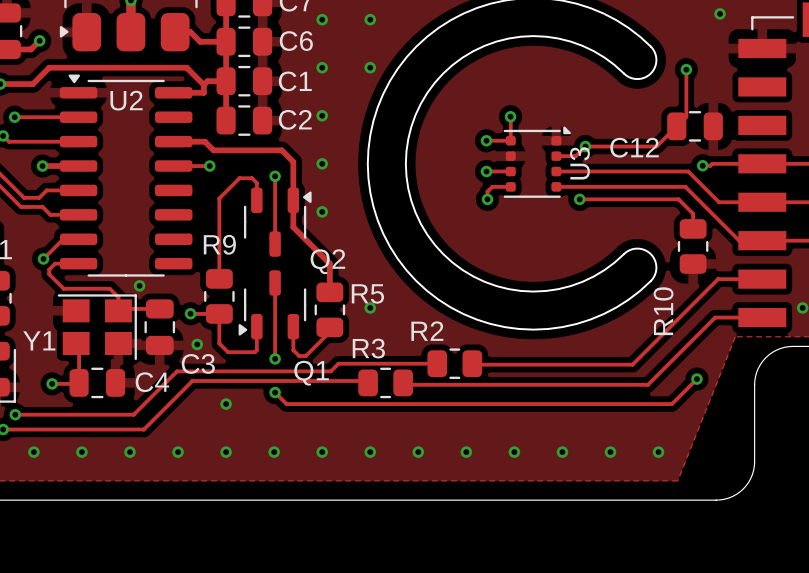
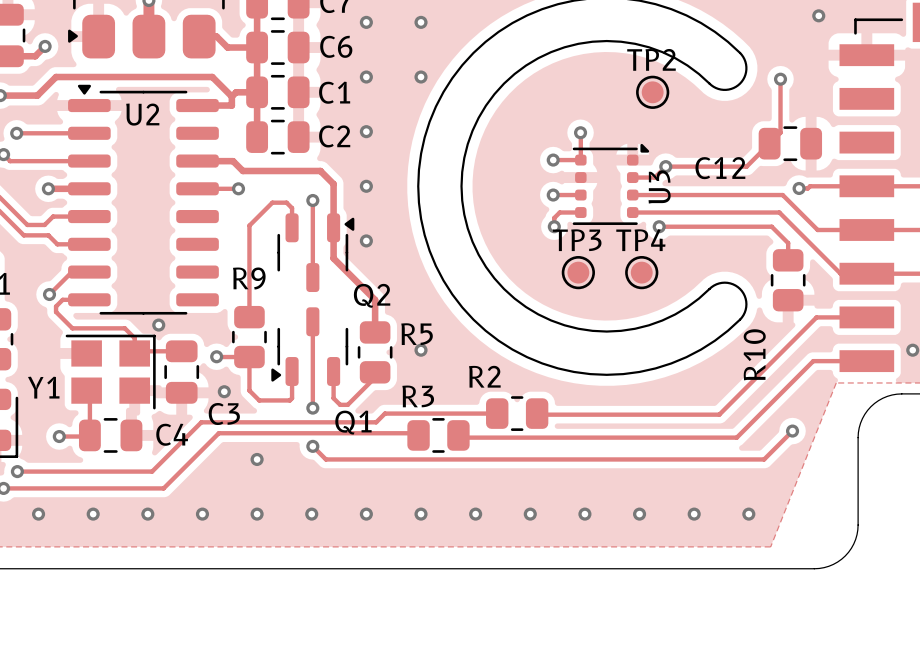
TP2: none -> (652, 92)
TP3: none -> (578, 272)
TP4: none -> (641, 272)

